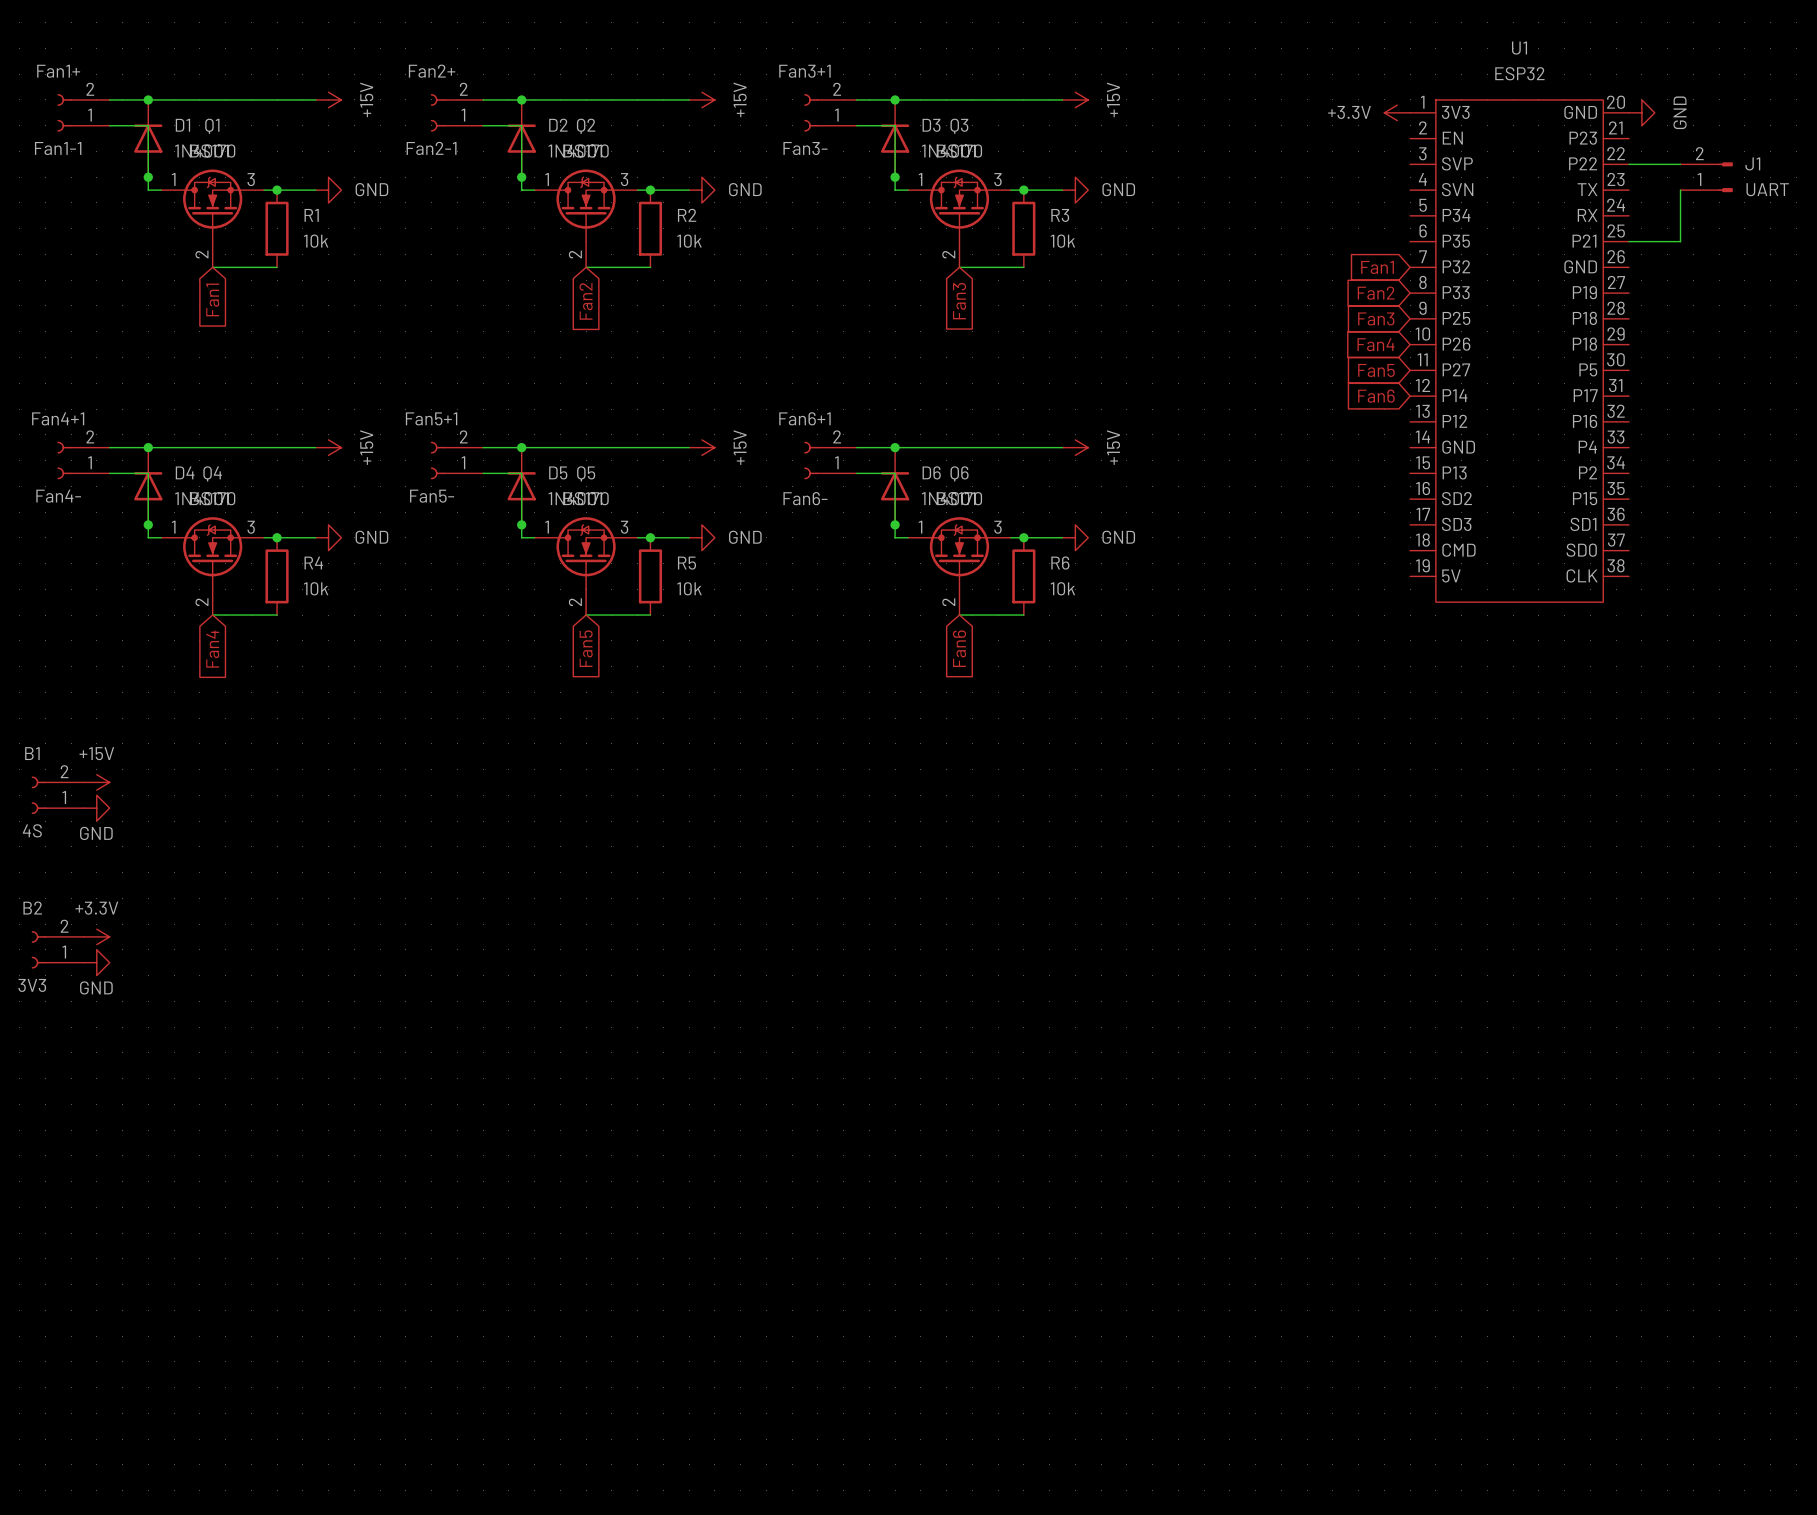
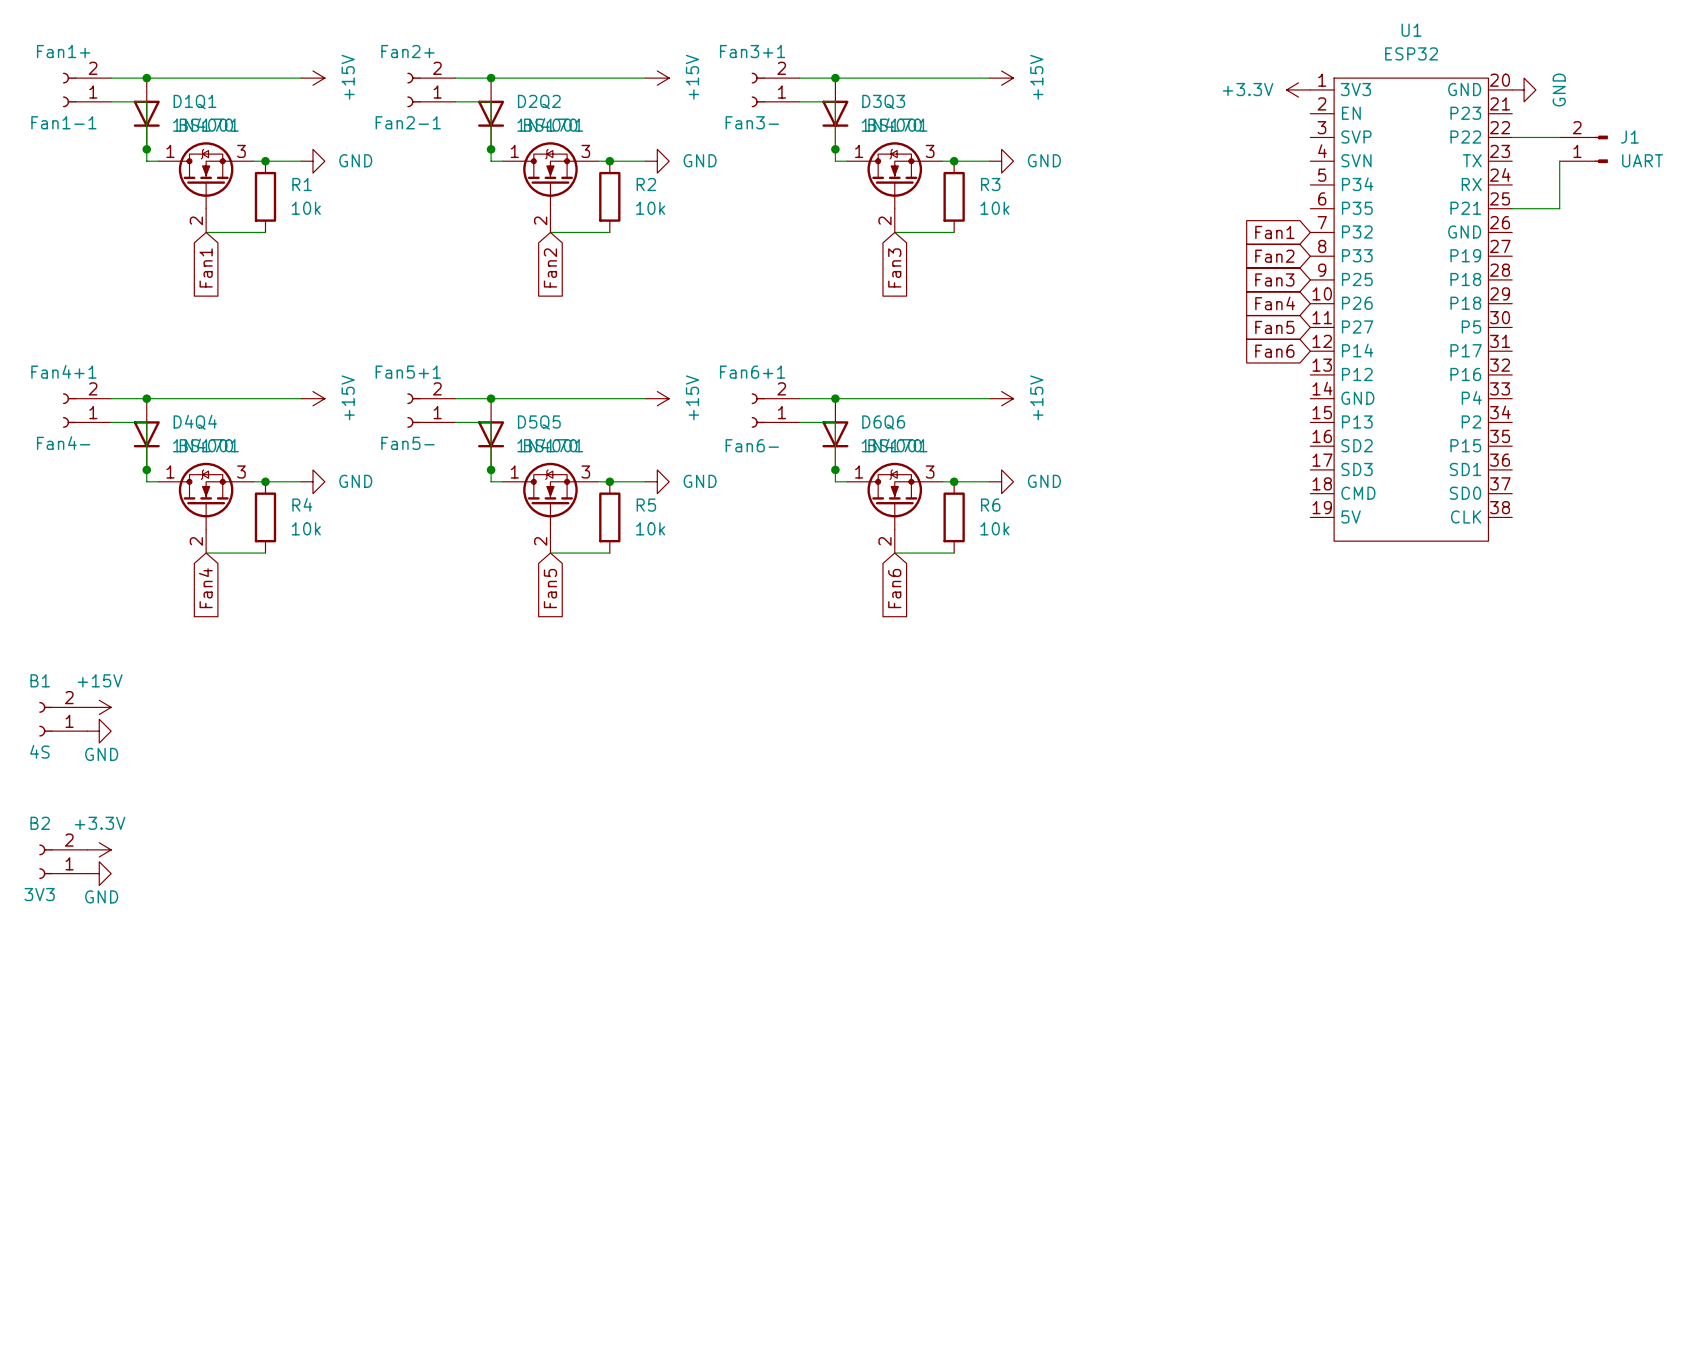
D1 rotation: 0° (148, 138) -> 180° (146, 113)
D2 rotation: 0° (521, 138) -> 180° (491, 113)
D3 rotation: 0° (895, 138) -> 180° (835, 113)
D4 rotation: 0° (148, 486) -> 180° (146, 434)
D5 rotation: 0° (521, 486) -> 180° (491, 434)
D6 rotation: 0° (895, 486) -> 180° (835, 434)

